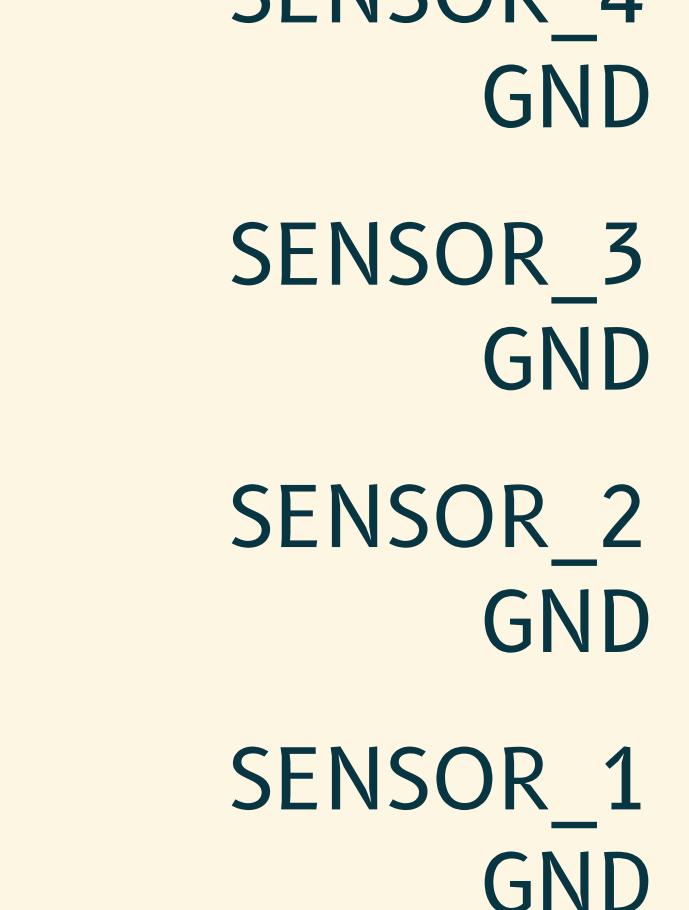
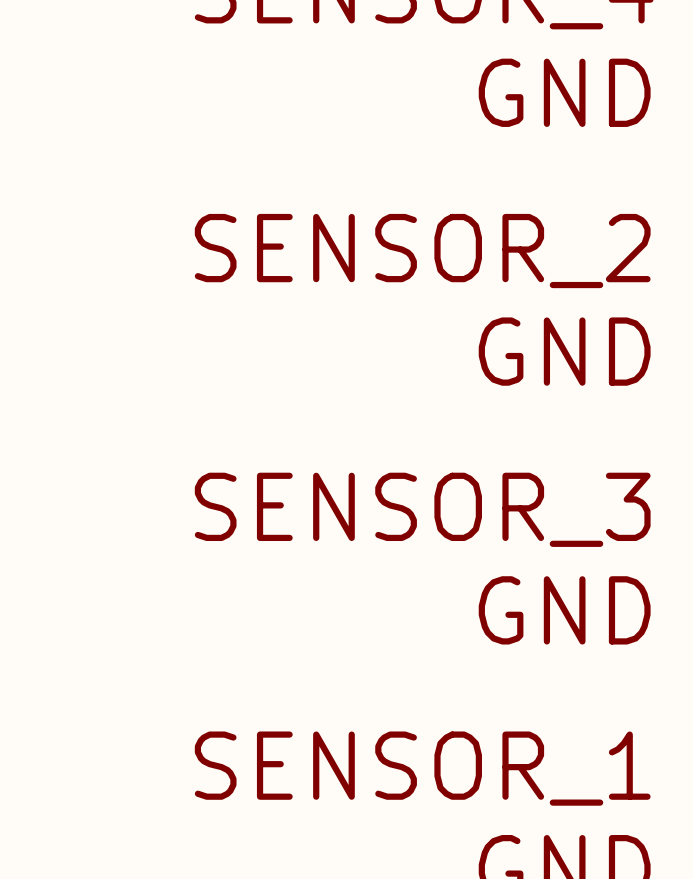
label: SENSOR_3 (436, 262) -> SENSOR_2 (422, 251)
label: SENSOR_2 (436, 524) -> SENSOR_3 (422, 509)

